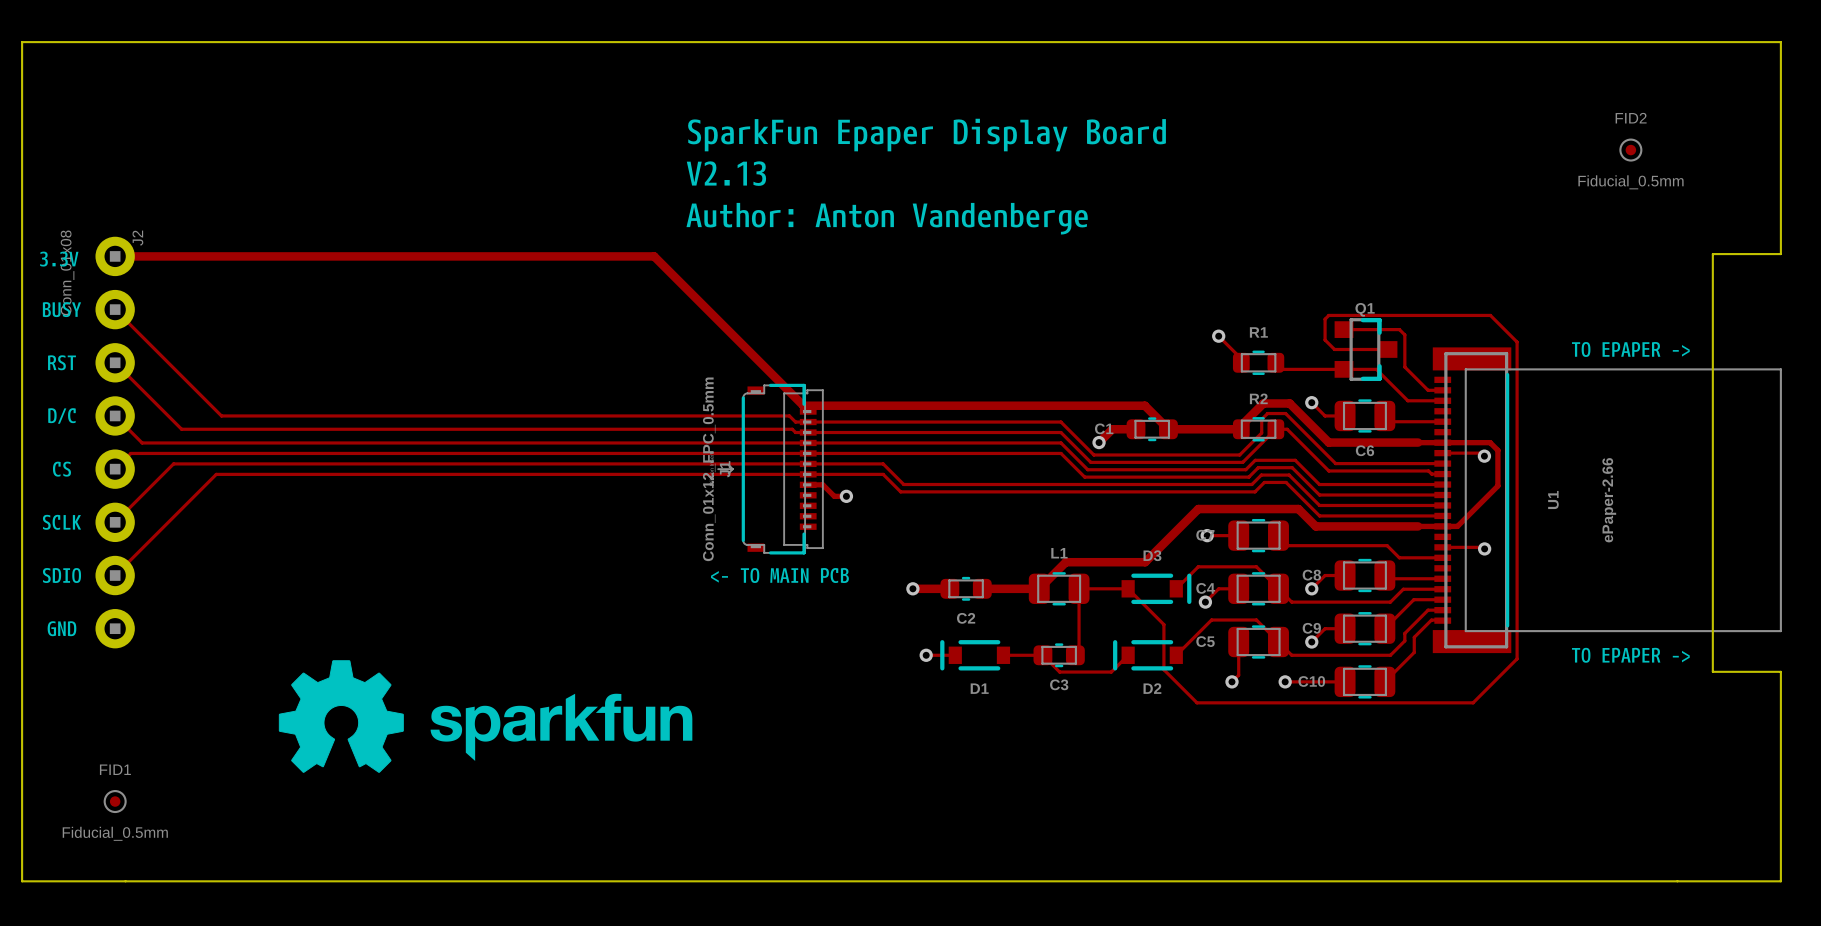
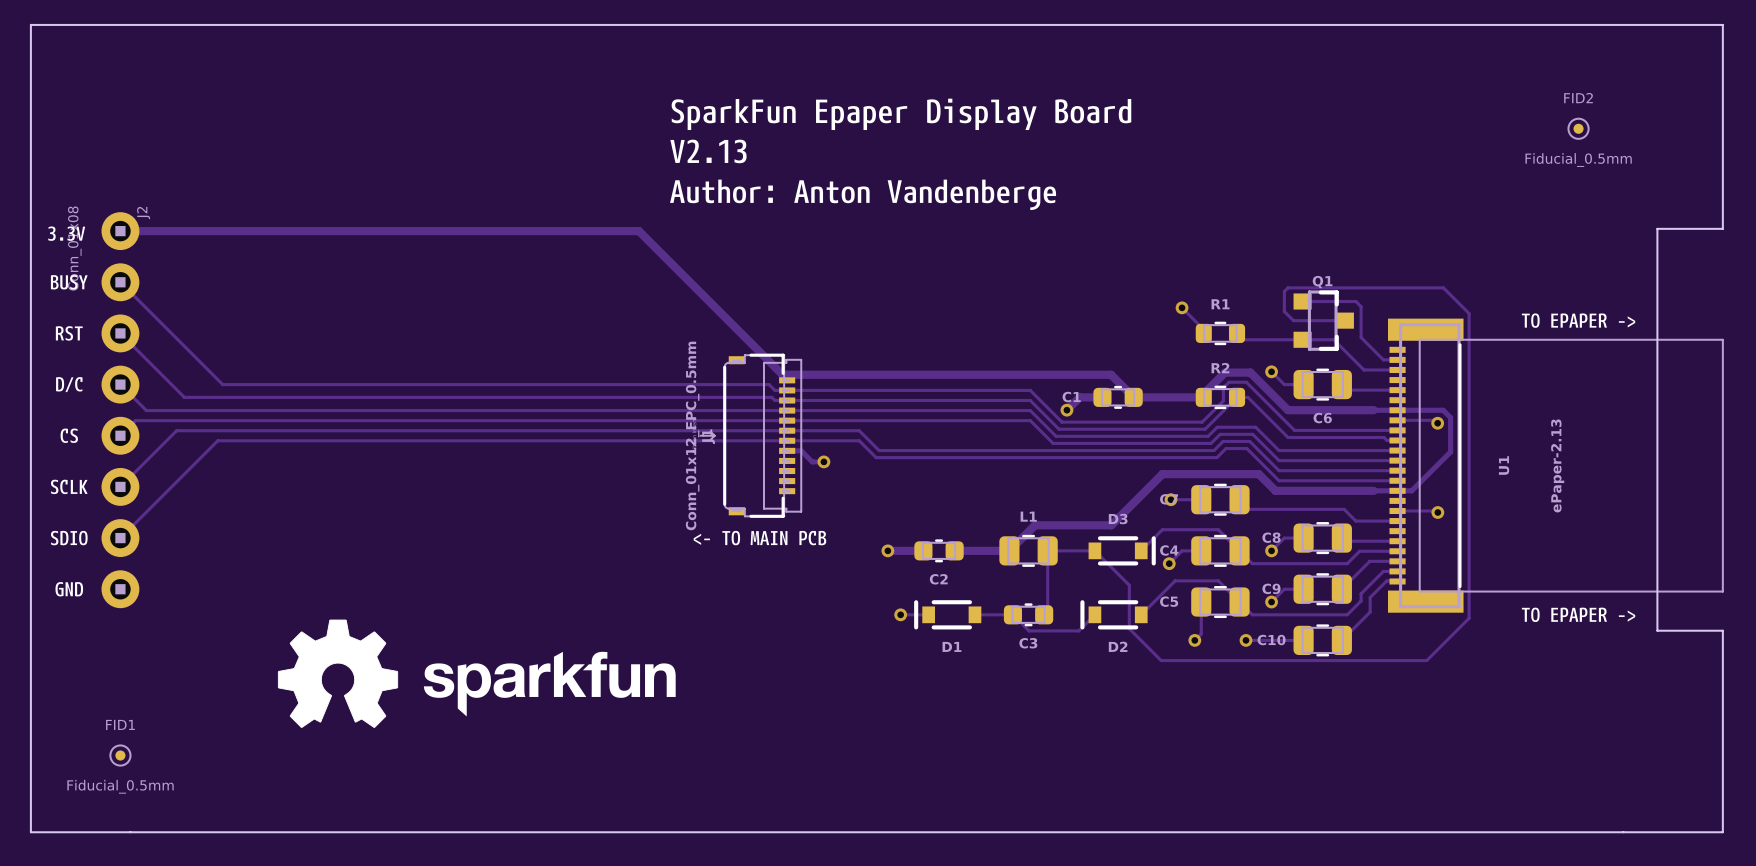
U1 value: ePaper-2.66 (1609, 500) -> ePaper-2.13 (1557, 465)

